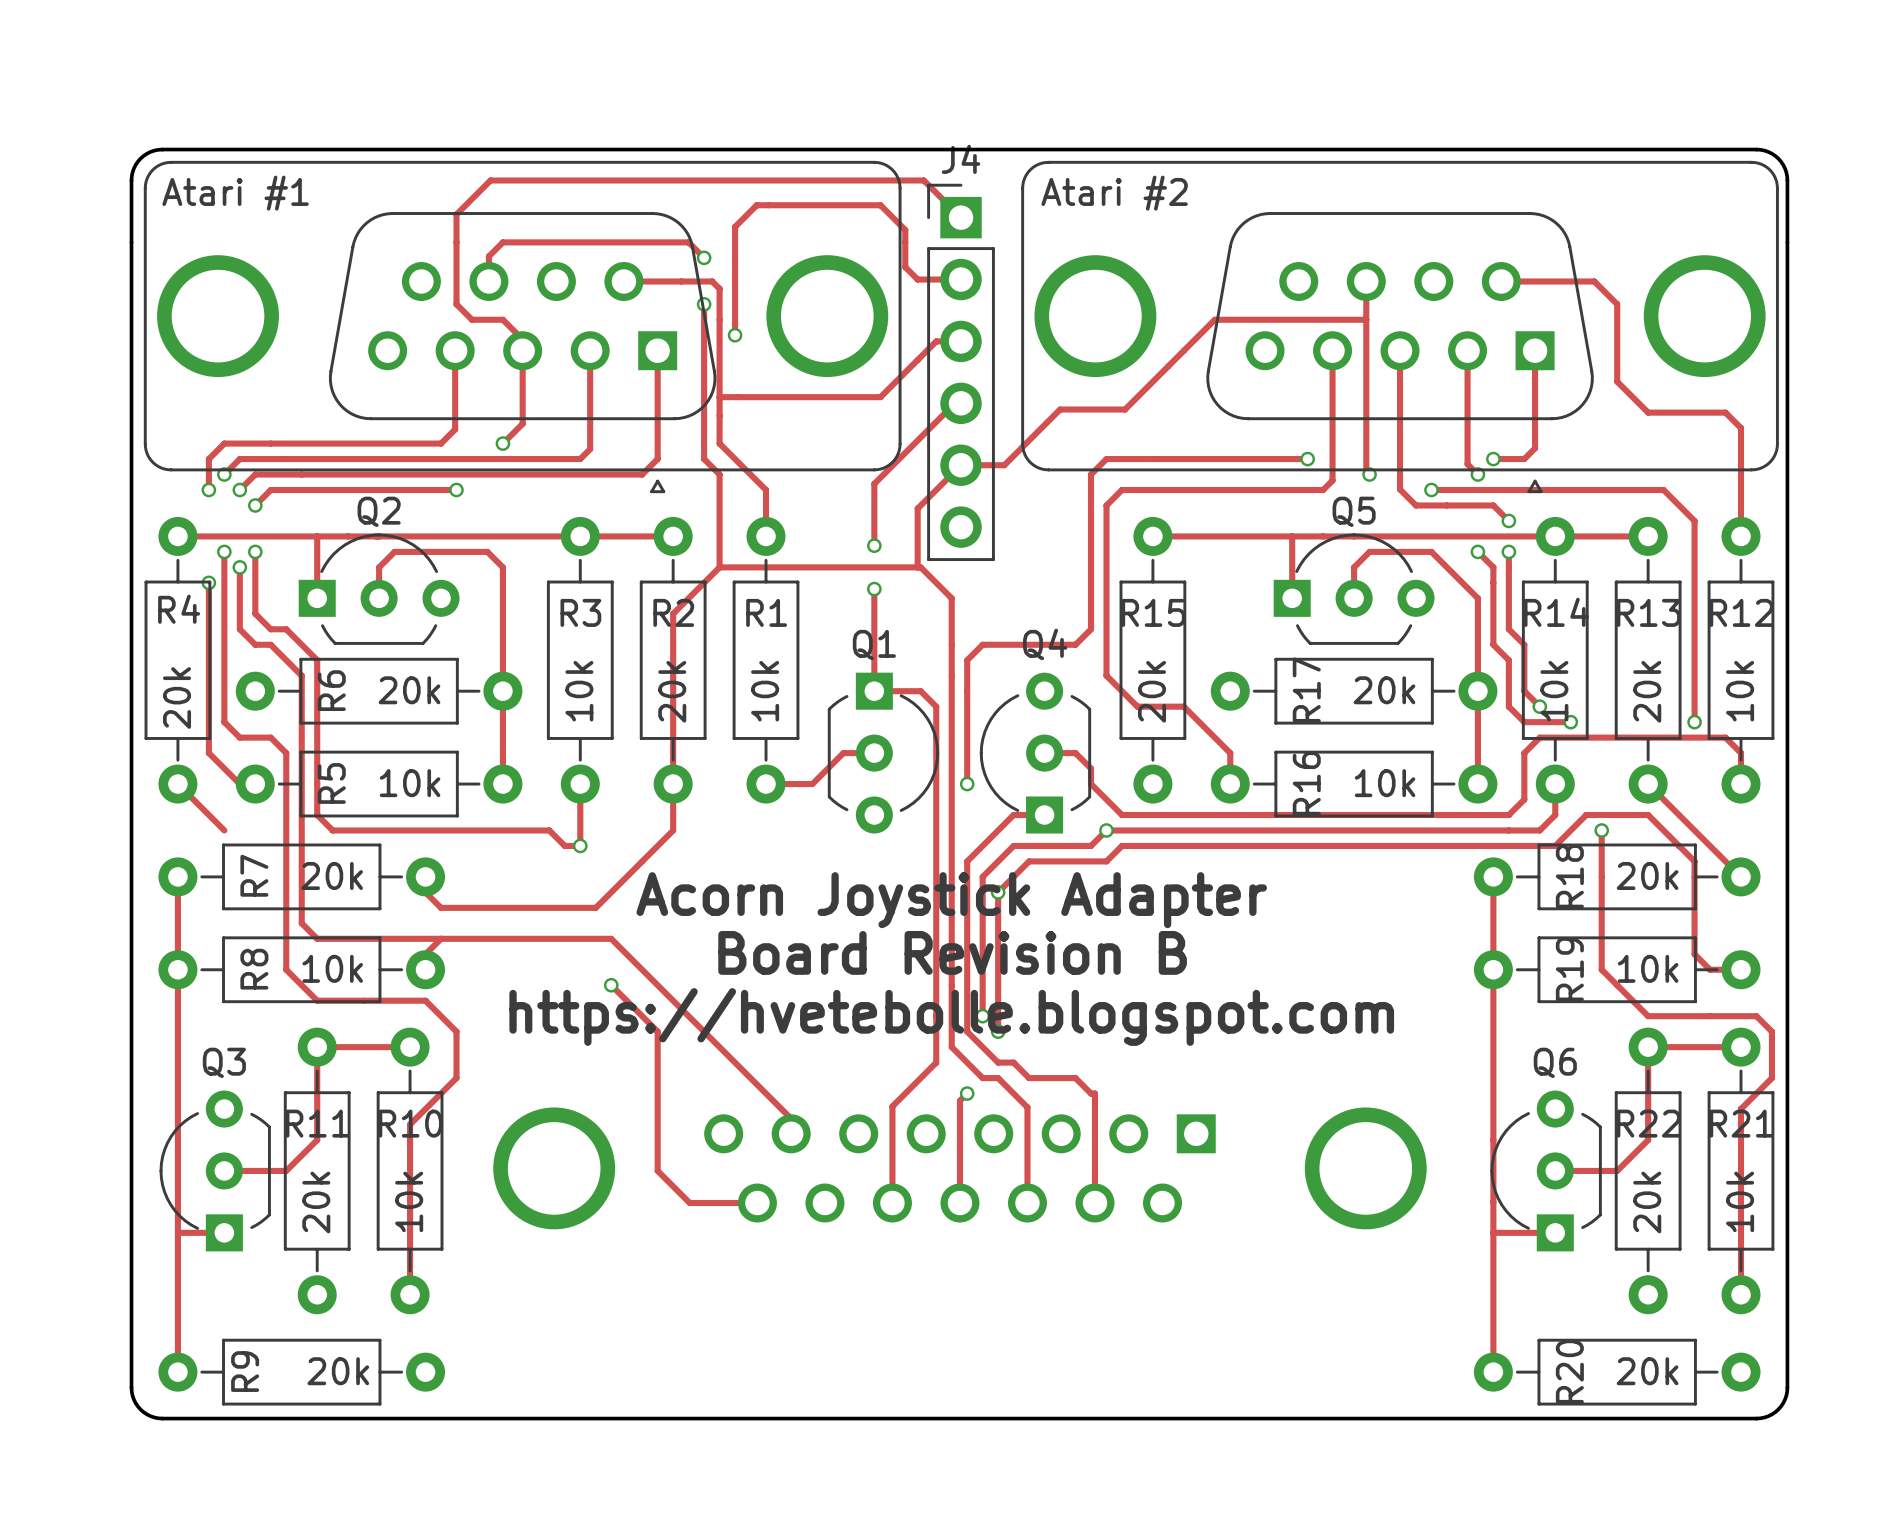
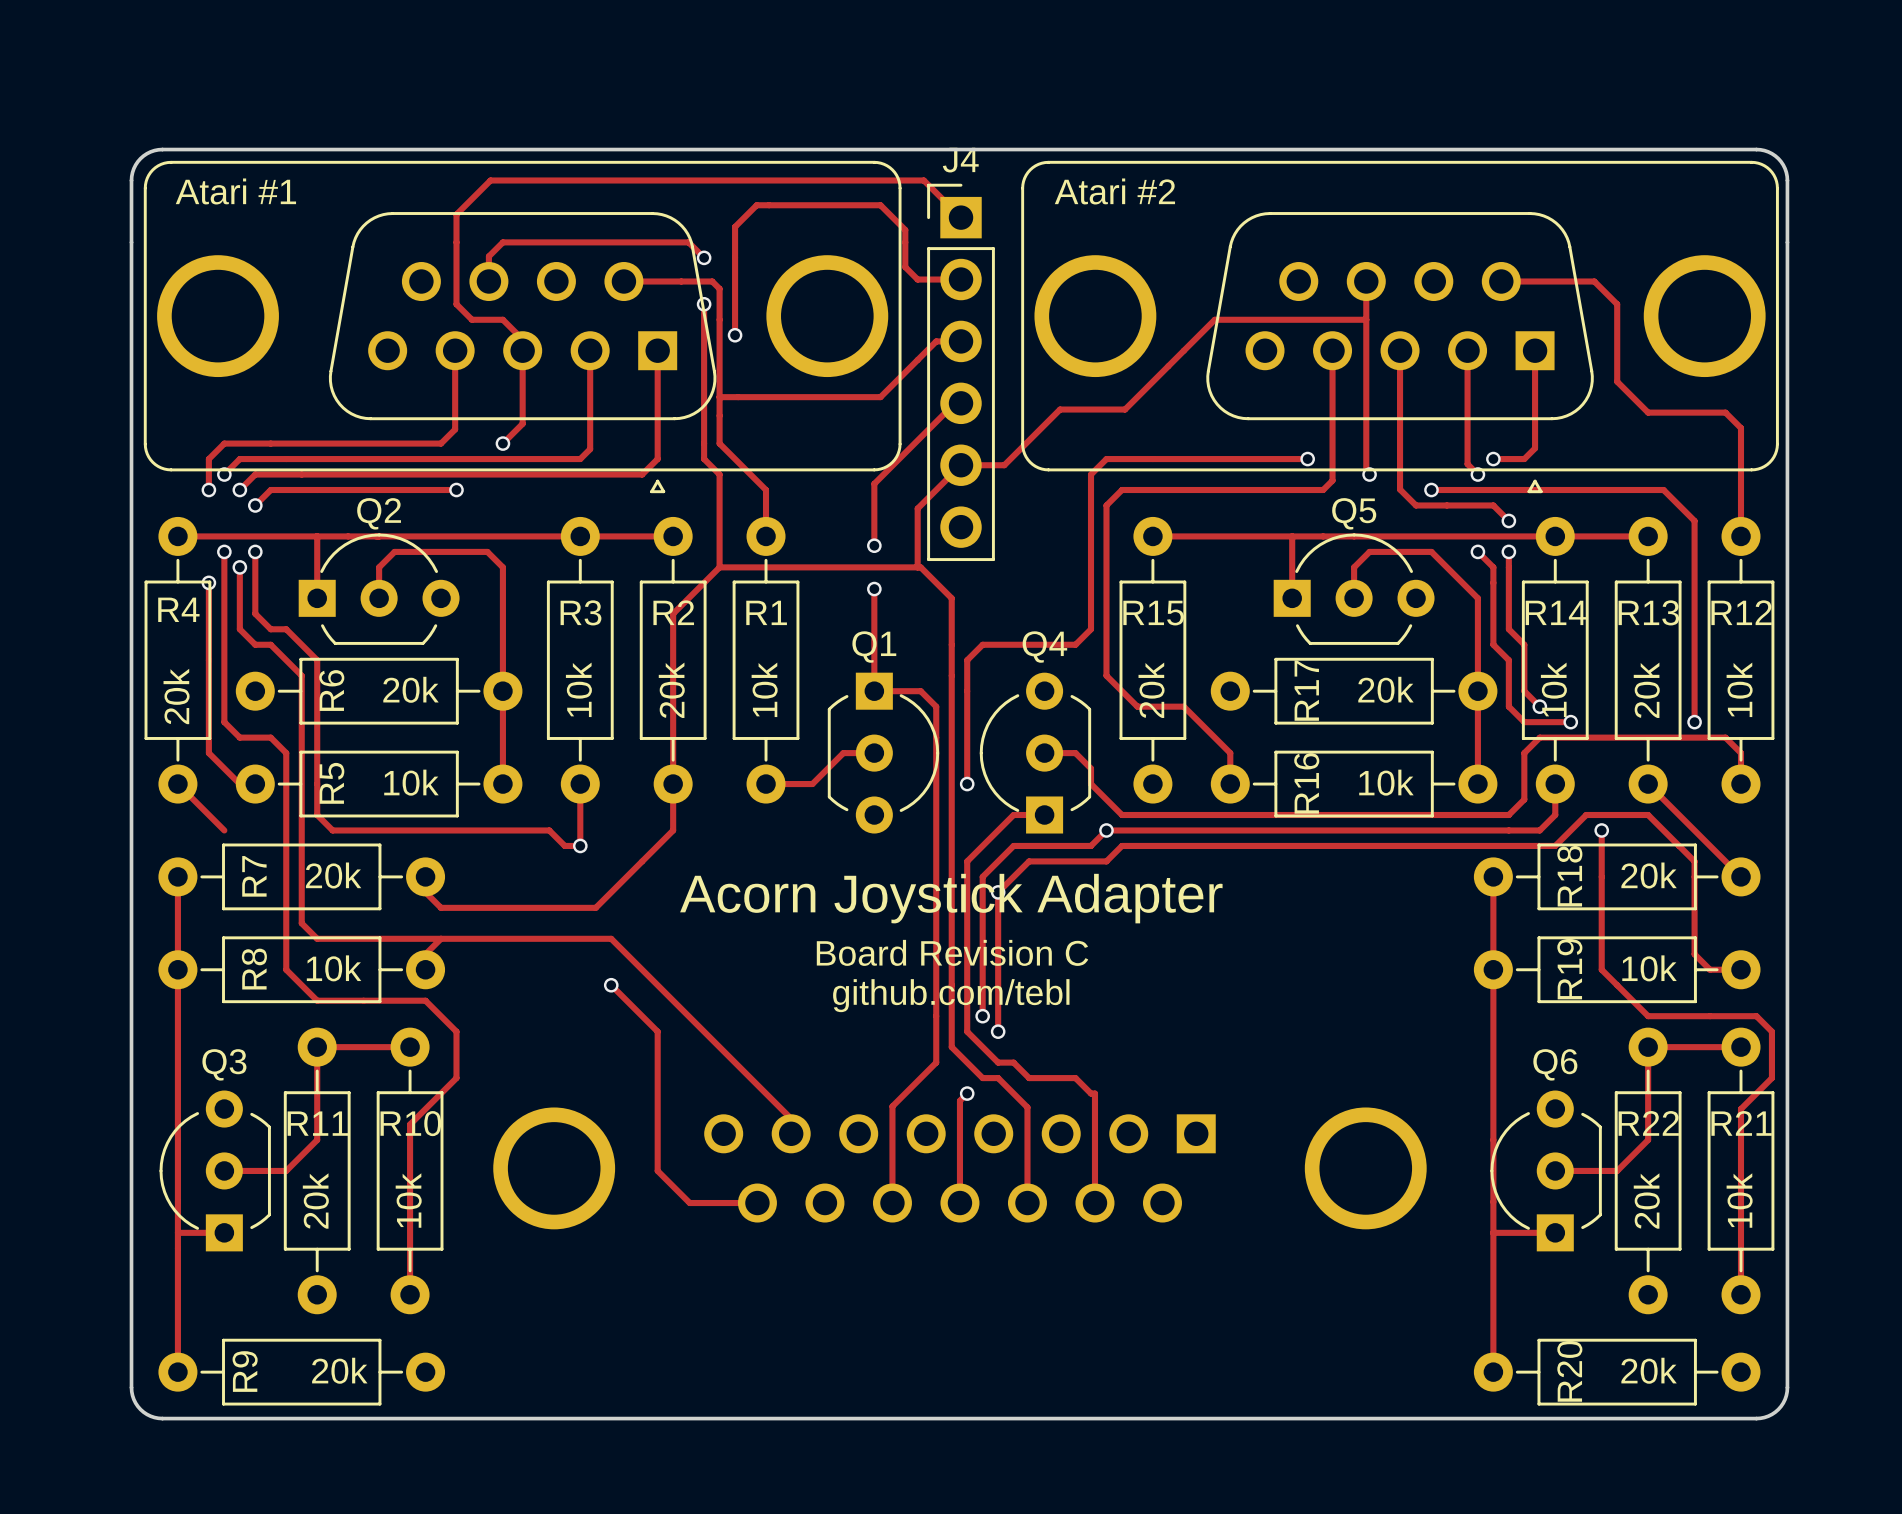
text: Board Revision B (952, 952) -> Board Revision C (952, 952)
text: https://hvetebolle.blogspot.com (951, 1017) -> github.com/tebl (951, 995)

